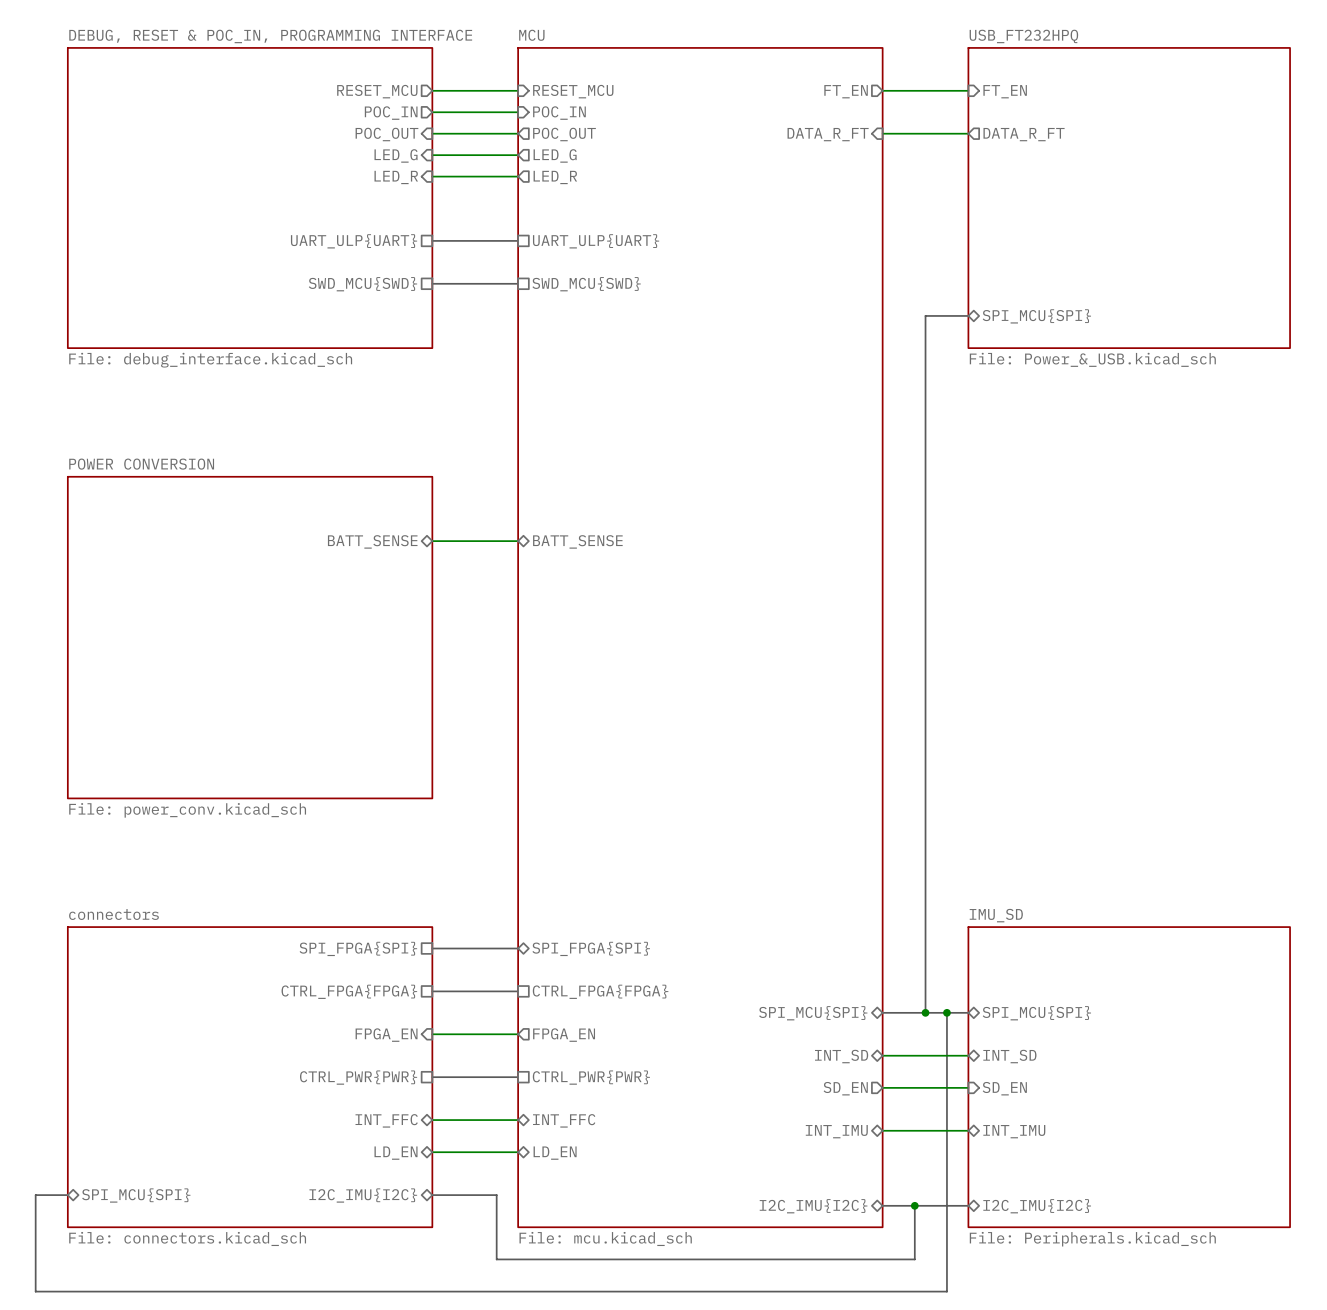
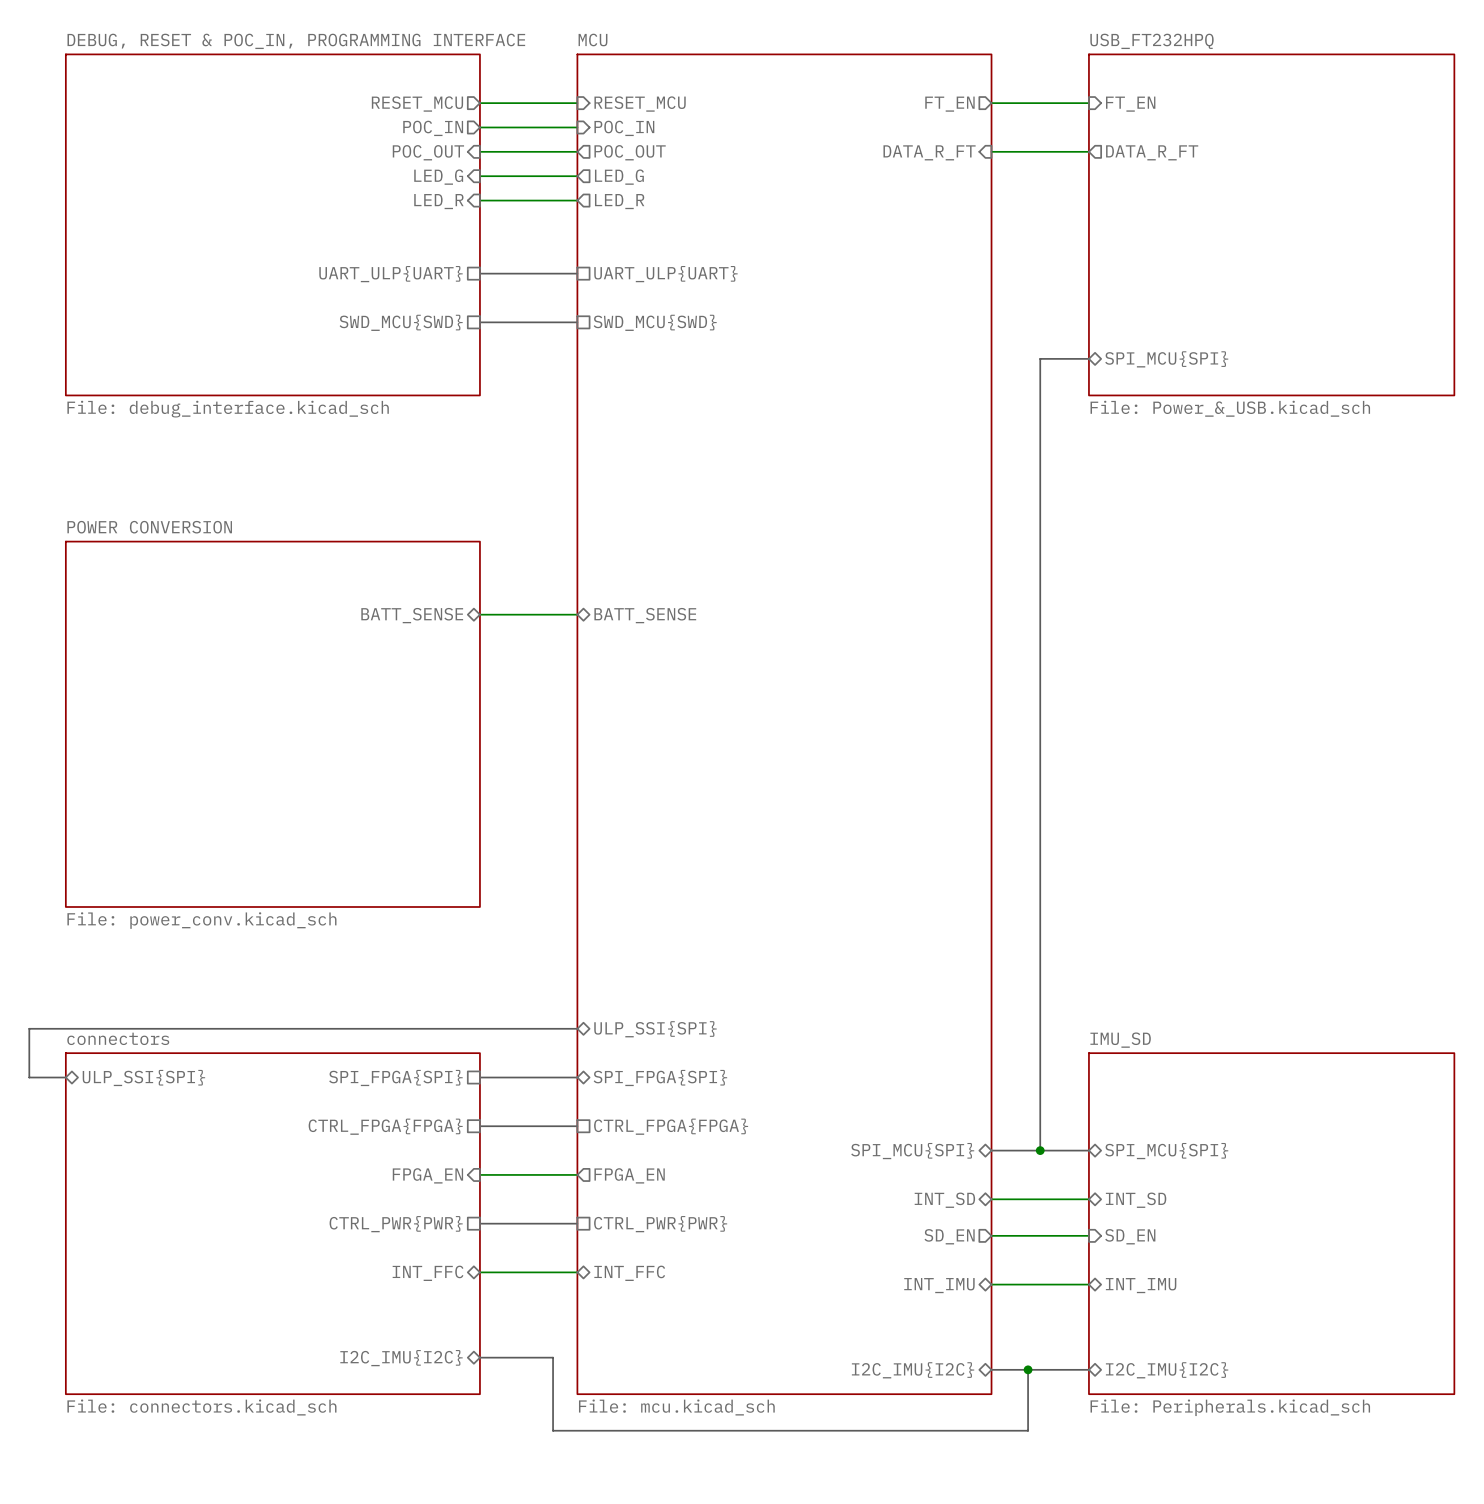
bus: none -> (577, 1028) (29, 1028) (29, 1077) (65, 1077)
sheet pin: none -> ULP_SSI{SPI} (655, 1029)
sheet pin: none -> ULP_SSI{SPI} (143, 1077)
bus: (946, 1012) (946, 1291) (35, 1291) (35, 1195) (67, 1195) -> none
junction: (946, 1012) -> none
wire: (432, 1152) (518, 1152) -> none
sheet pin: LD_EN (396, 1153) -> none
sheet pin: LD_EN (555, 1153) -> none
sheet pin: SPI_MCU{SPI} (136, 1195) -> none

